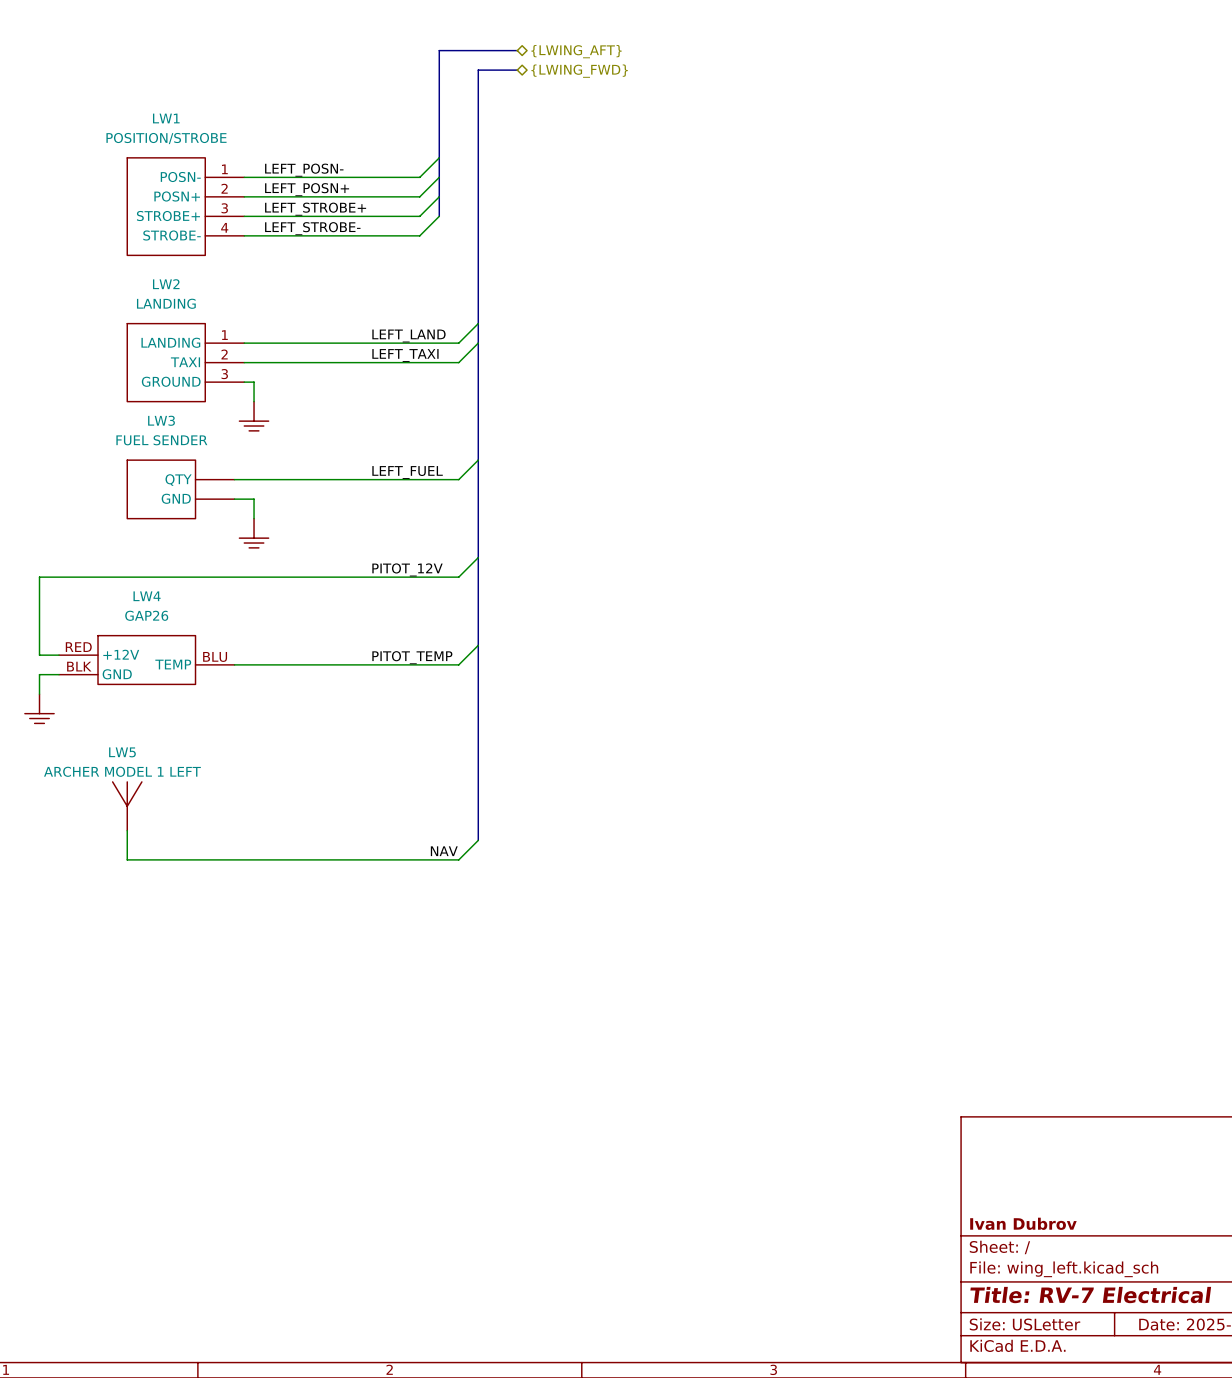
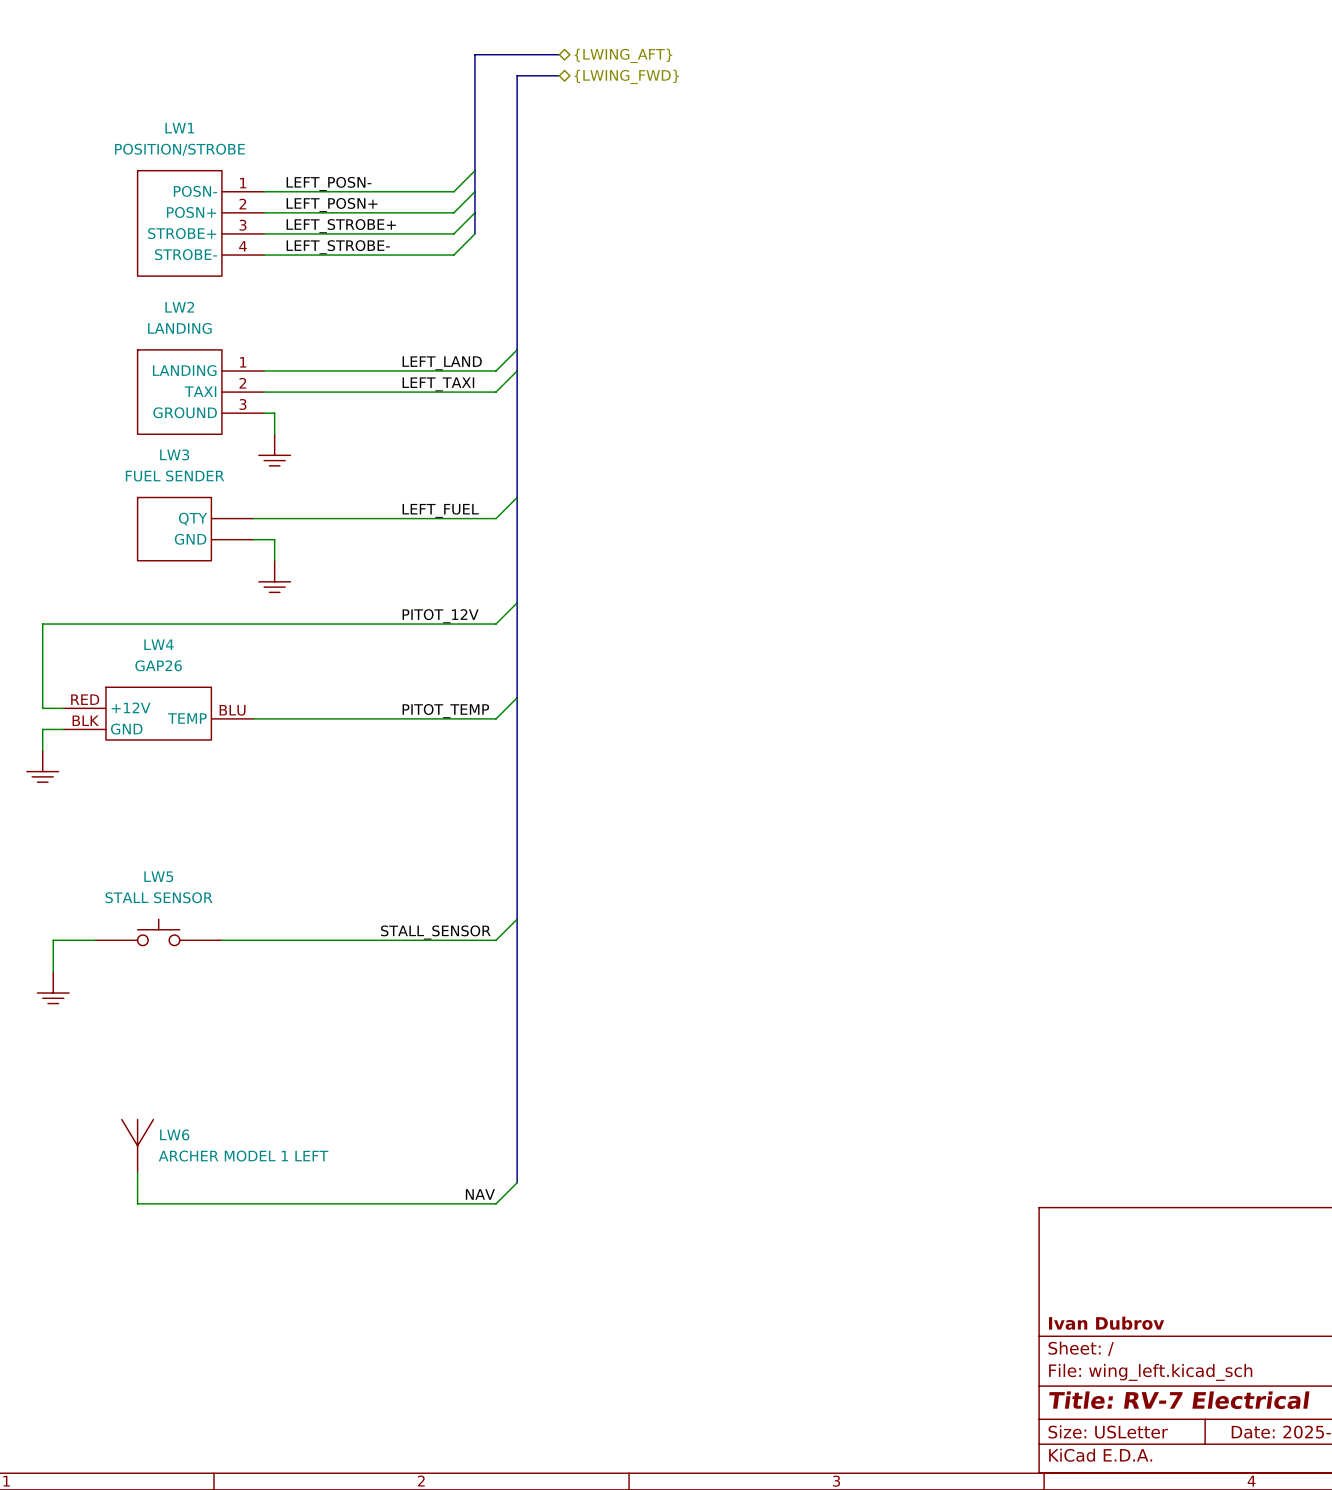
LW5 value: ARCHER MODEL 1 LEFT (122, 771) -> STALL SENSOR (158, 897)
LW5 symbol: [112, 781, 142, 831] -> [95, 919, 222, 946]
wire: (127, 830) (127, 859) (458, 859) (478, 840) -> none
bus: none -> (517, 908) (517, 1182)
wire: none -> (517, 919) (496, 940) (221, 940)
label: NAV (444, 851) -> none
label: none -> STALL_SENSOR (435, 932)
wire: none -> (95, 940) (53, 940) (53, 971)
power symbol: none -> (53, 987)
LW6: none -> ARCHER MODEL 1 LEFT (137, 1145)
wire: none -> (137, 1172) (137, 1203) (496, 1203) (517, 1182)
label: none -> NAV (480, 1194)

